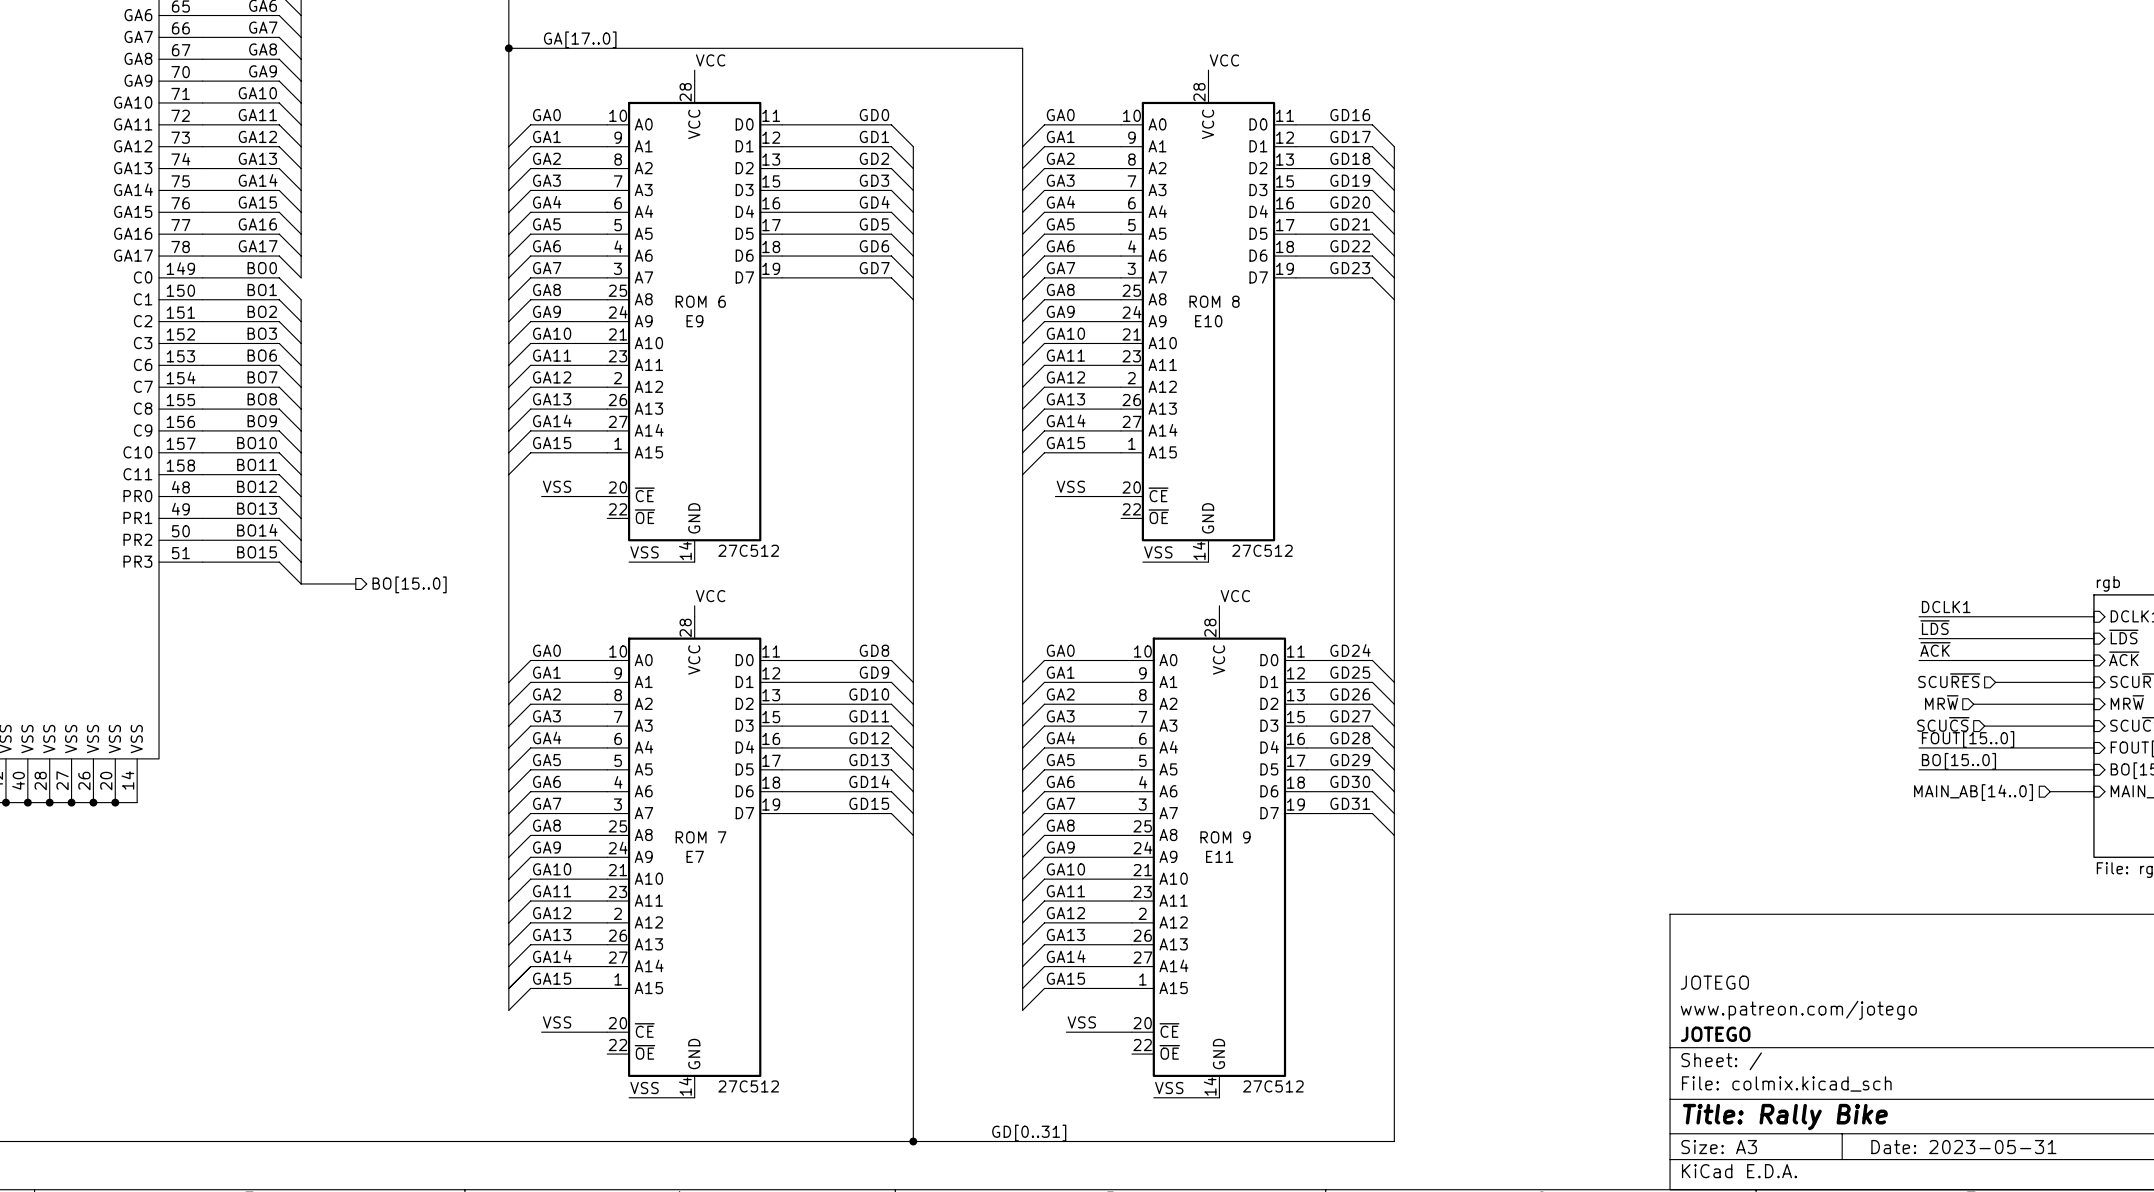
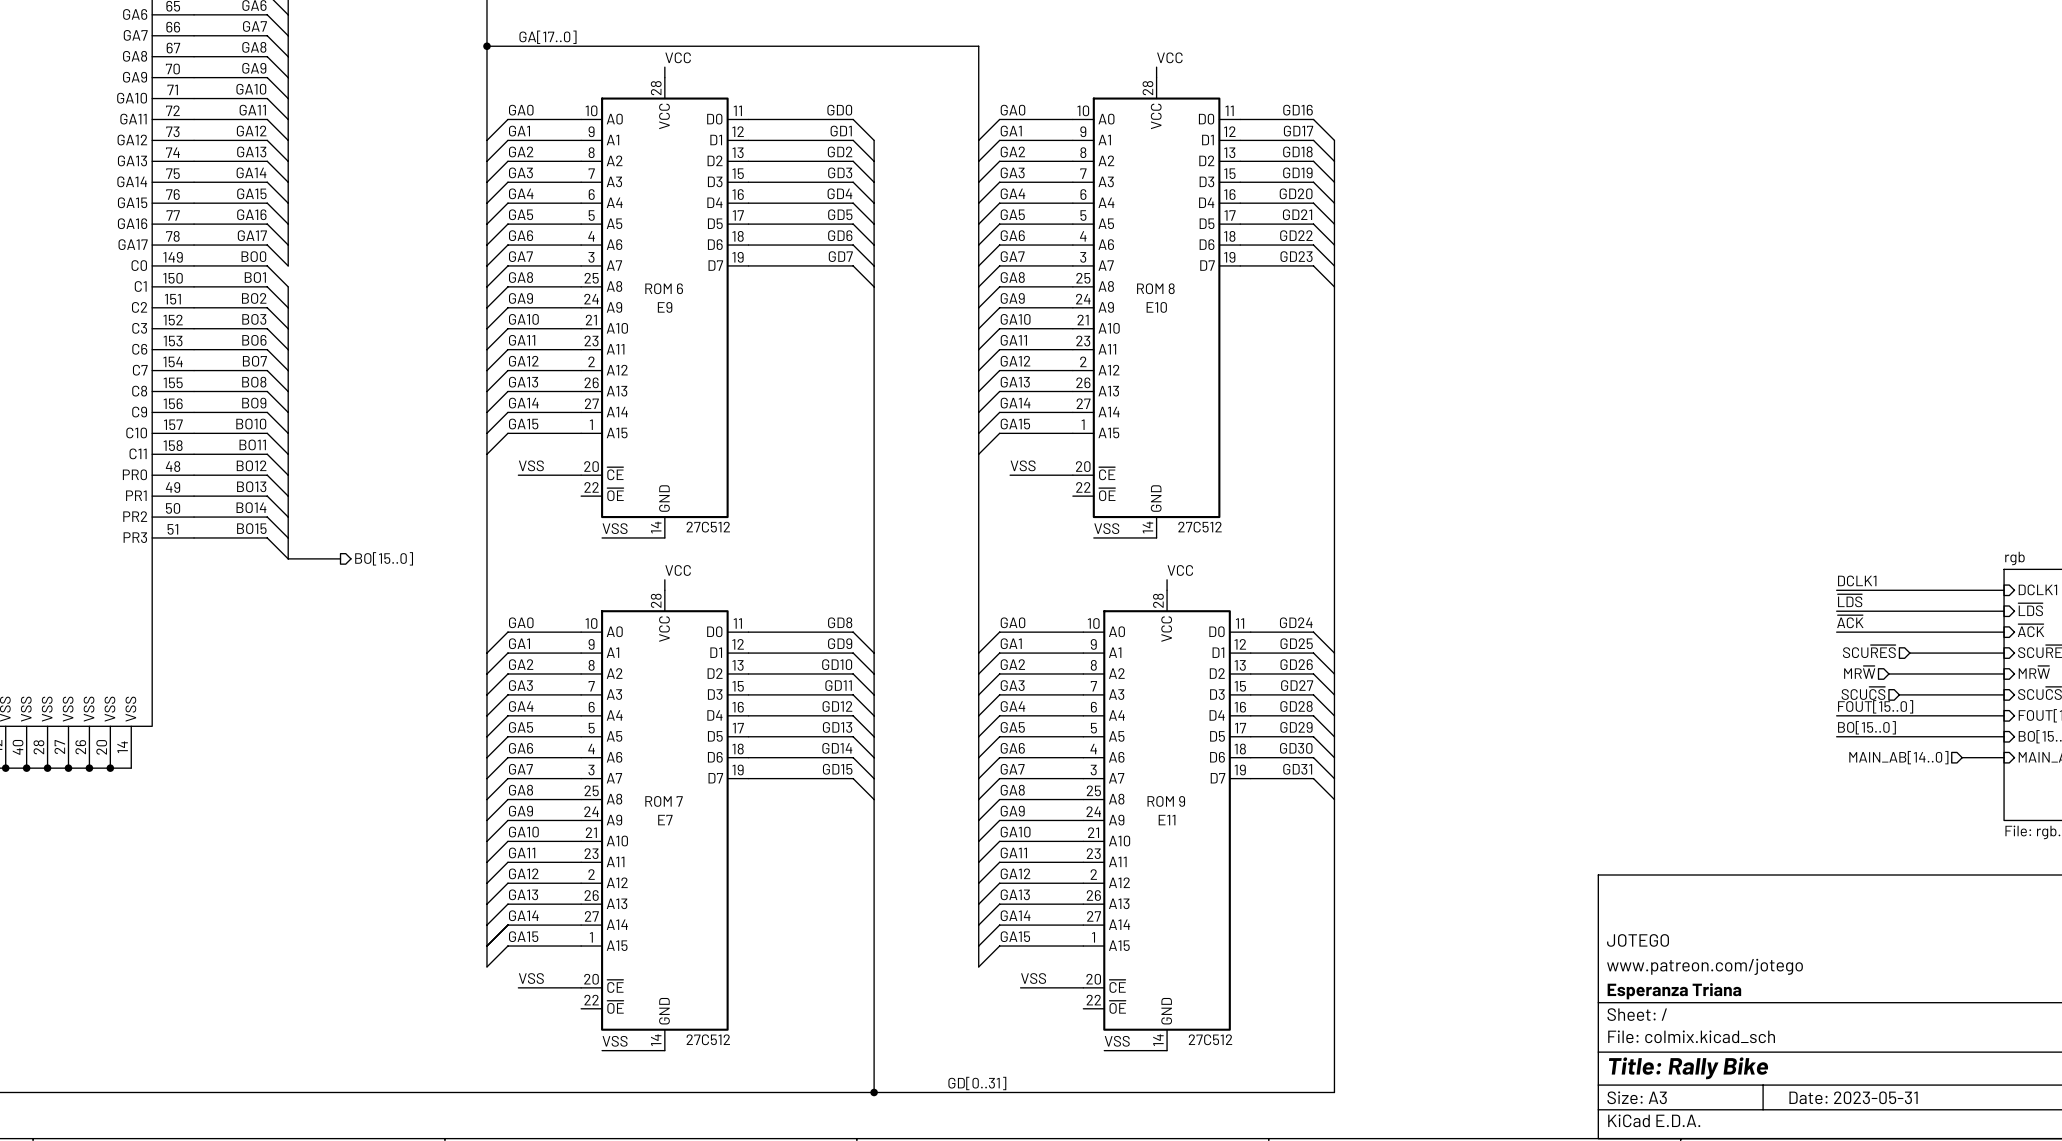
title block: JOTEGO (1715, 1034) -> Esperanza Triana (1674, 991)

